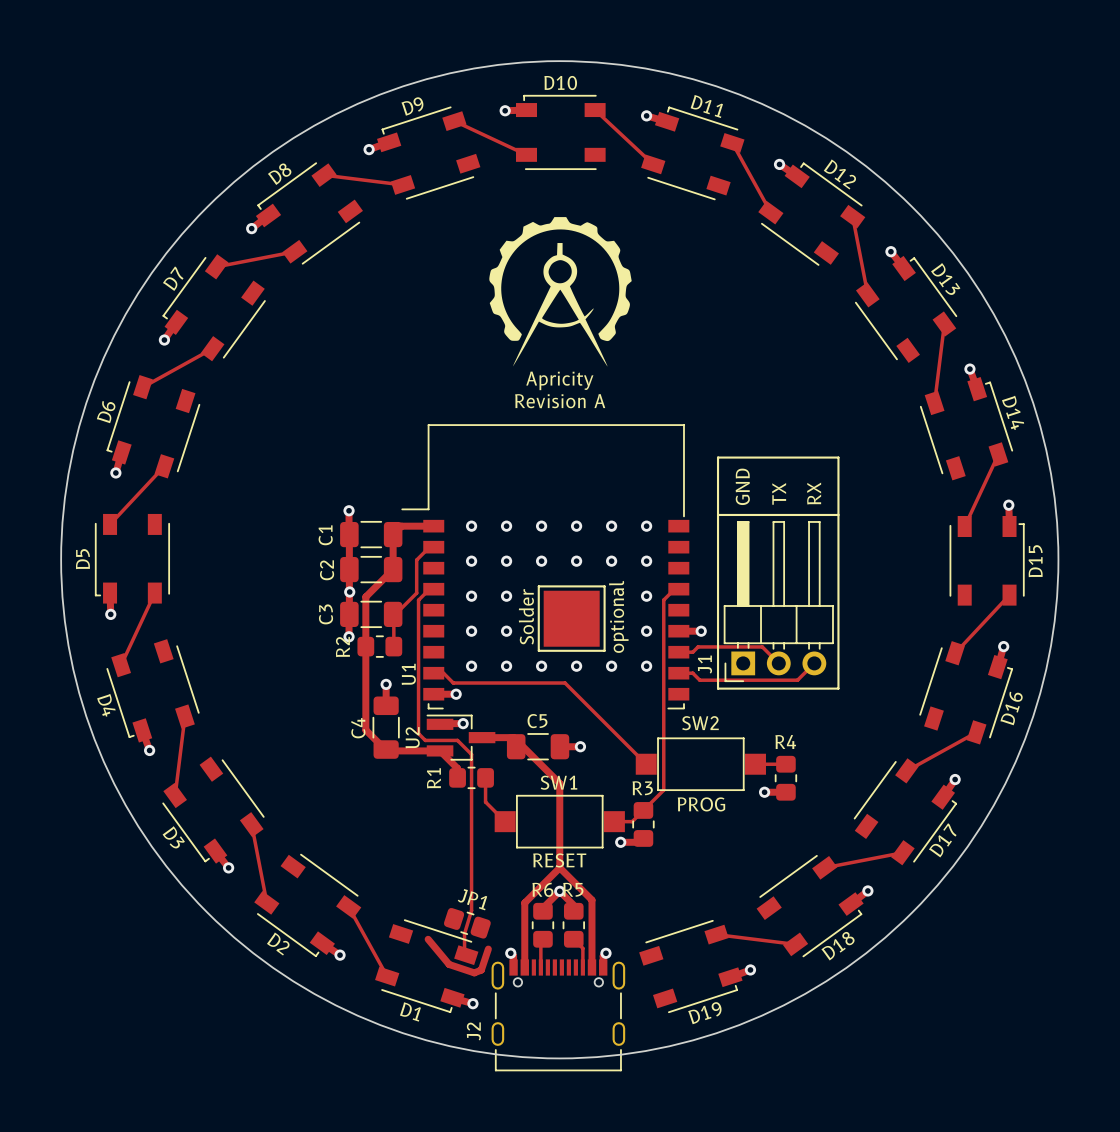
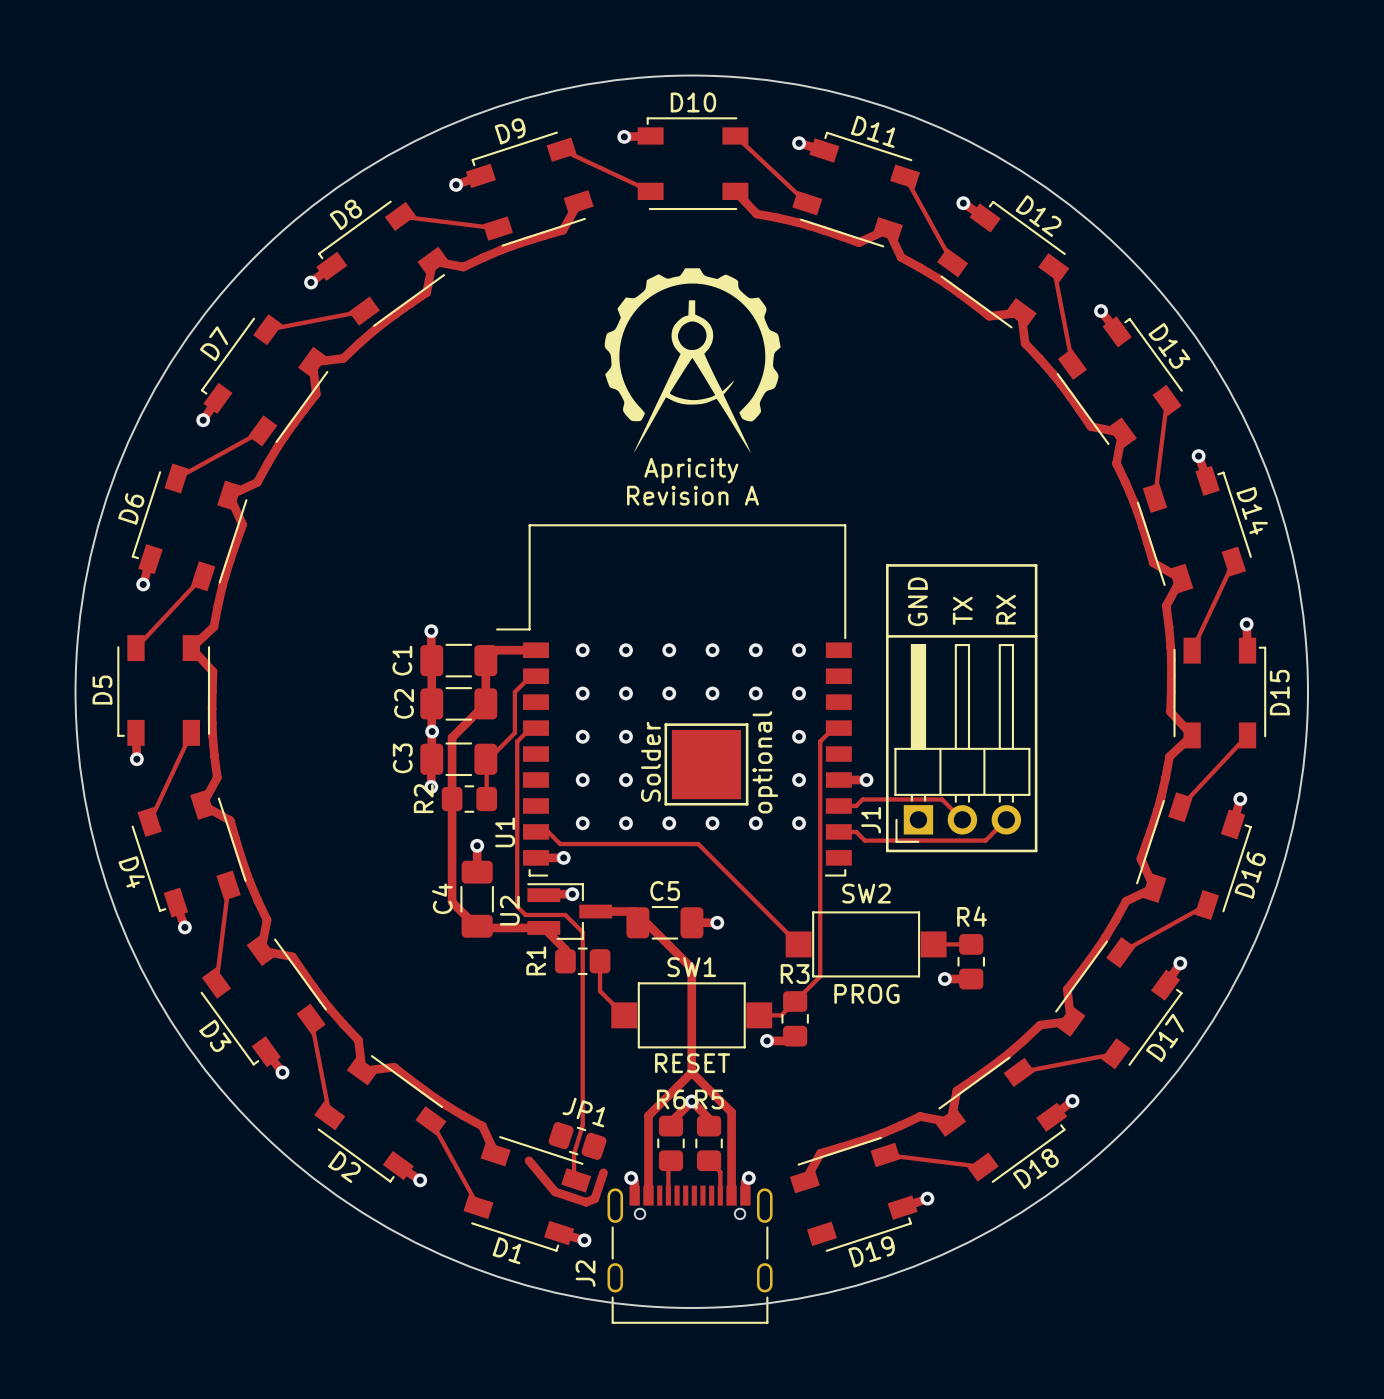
top track: none -> (735, 191) (756, 213) (797, 222) (858, 242) (887, 229) (901, 257) (937, 278) (989, 316) (1021, 312) (1025, 343) (1061, 384) (1090, 426) (1122, 432) (1116, 463) (1133, 501) (1153, 562) (1181, 578) (1166, 605) (1170, 647) (1170, 711) (1192, 735) (1169, 756) (1161, 797) (1140, 858) (1154, 887) (1126, 901) (1105, 937) (1067, 989) (1070, 1021) (1040, 1025) (999, 1061) (956, 1090) (950, 1122) (920, 1116) (881, 1133) (820, 1153) (804, 1181)
top track: none -> (578, 202) (562, 230) (501, 249) (463, 267) (432, 261) (426, 292) (384, 322) (343, 358) (312, 362) (316, 394) (278, 446) (257, 482) (229, 495) (242, 524) (225, 573) (213, 626) (191, 648) (213, 671) (212, 736) (217, 777) (202, 804) (230, 820) (249, 881) (267, 920) (261, 950) (292, 956) (322, 999) (358, 1040) (362, 1070) (394, 1067) (435, 1098) (482, 1126) (495, 1154)

